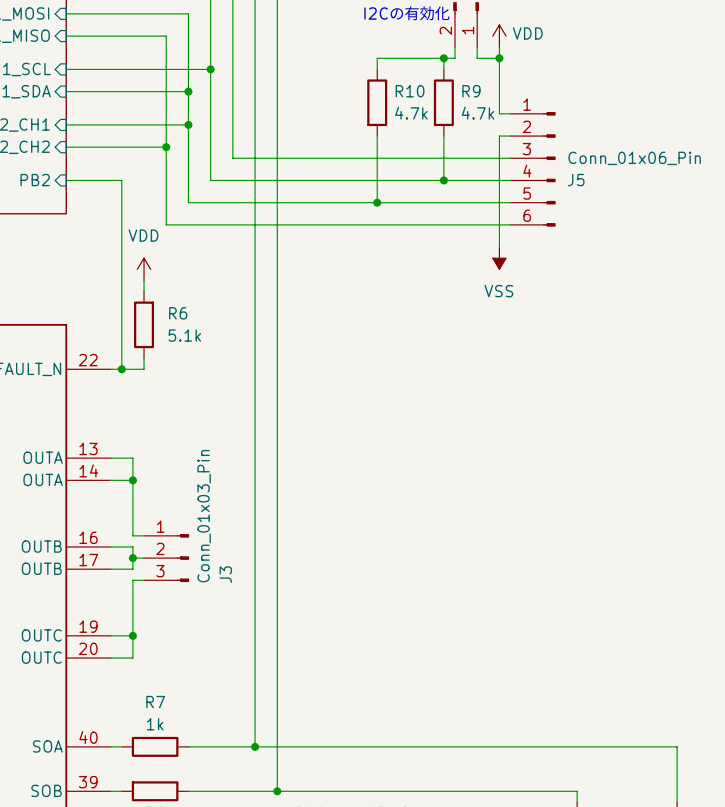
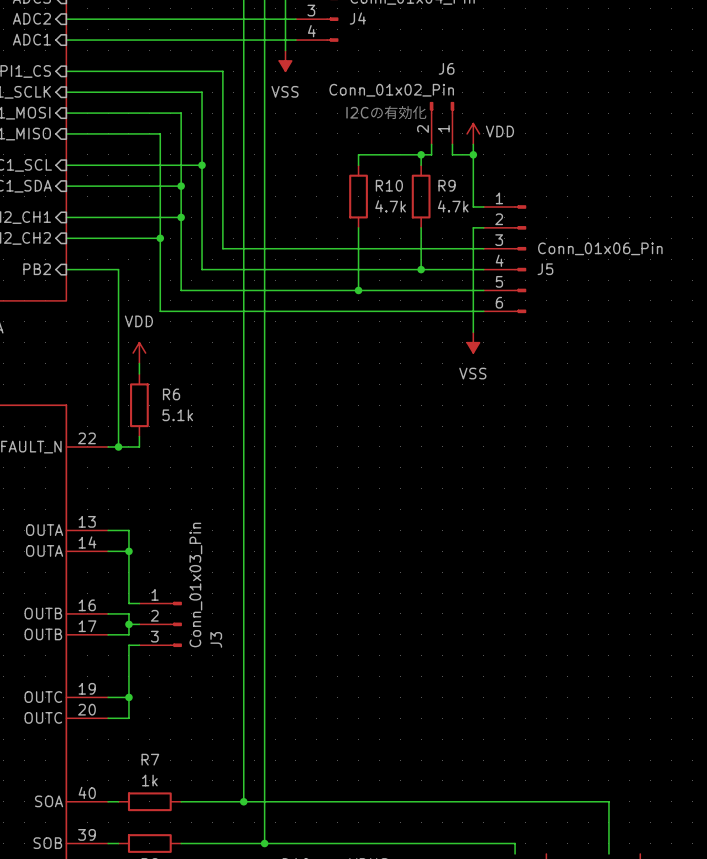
wire: (643, 746) (677, 746) (677, 802) -> (608, 801) (608, 853)
wire: (543, 791) (577, 791) (577, 802) -> (515, 843) (515, 853)

